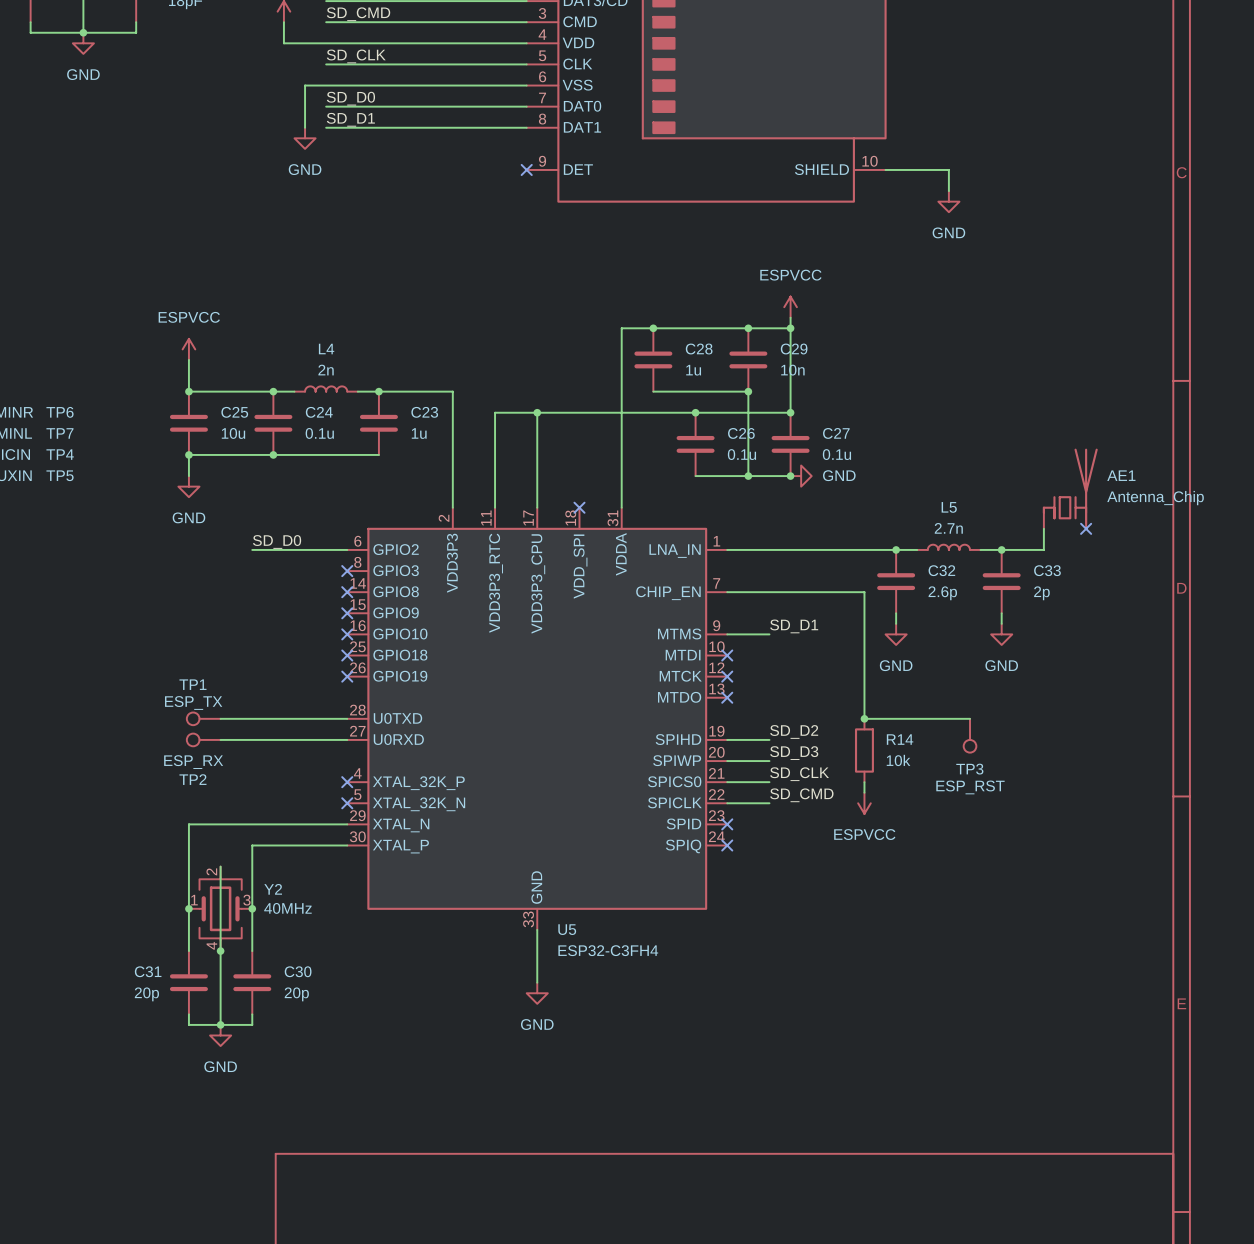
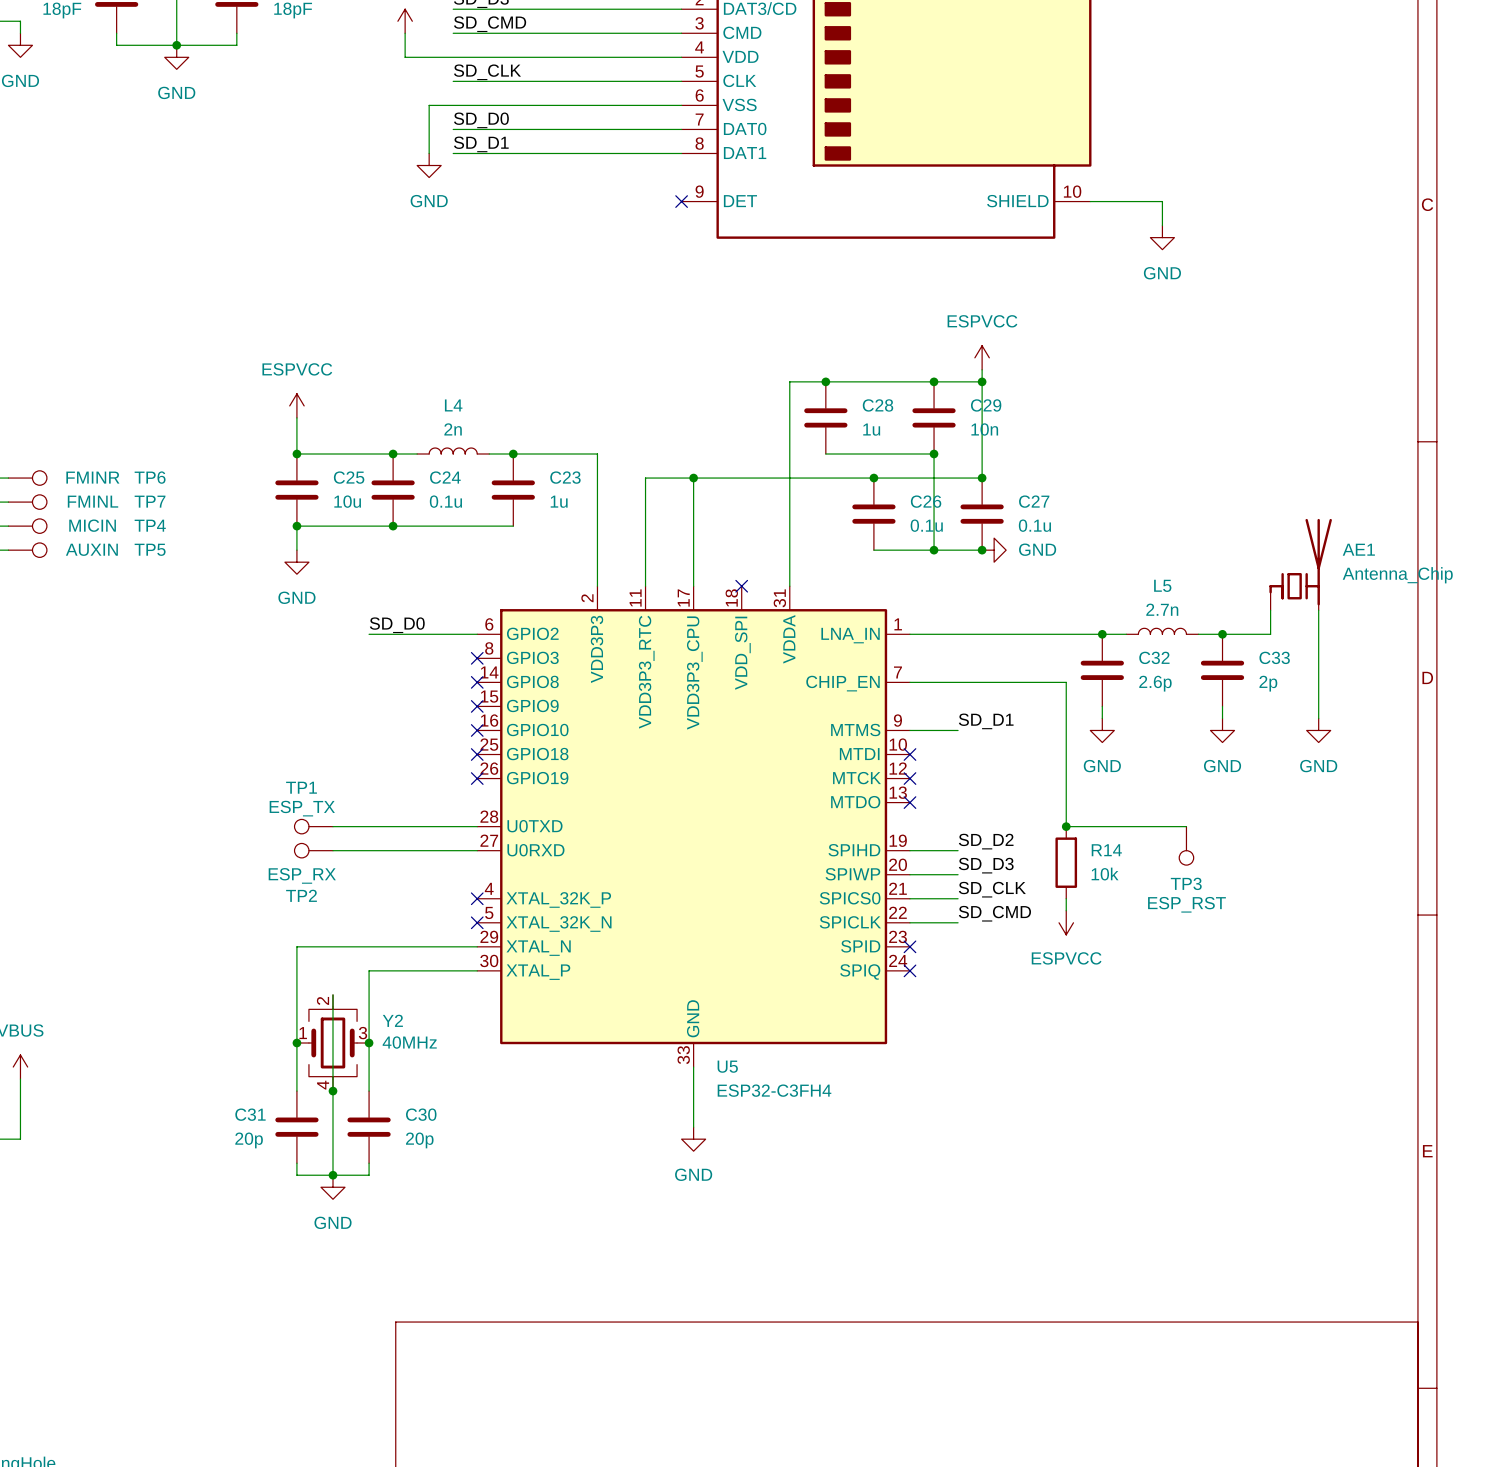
wire: none -> (1318, 610) (1318, 718)
no-connect mark: (1086, 528) -> none
power symbol: none -> GND (1318, 730)

